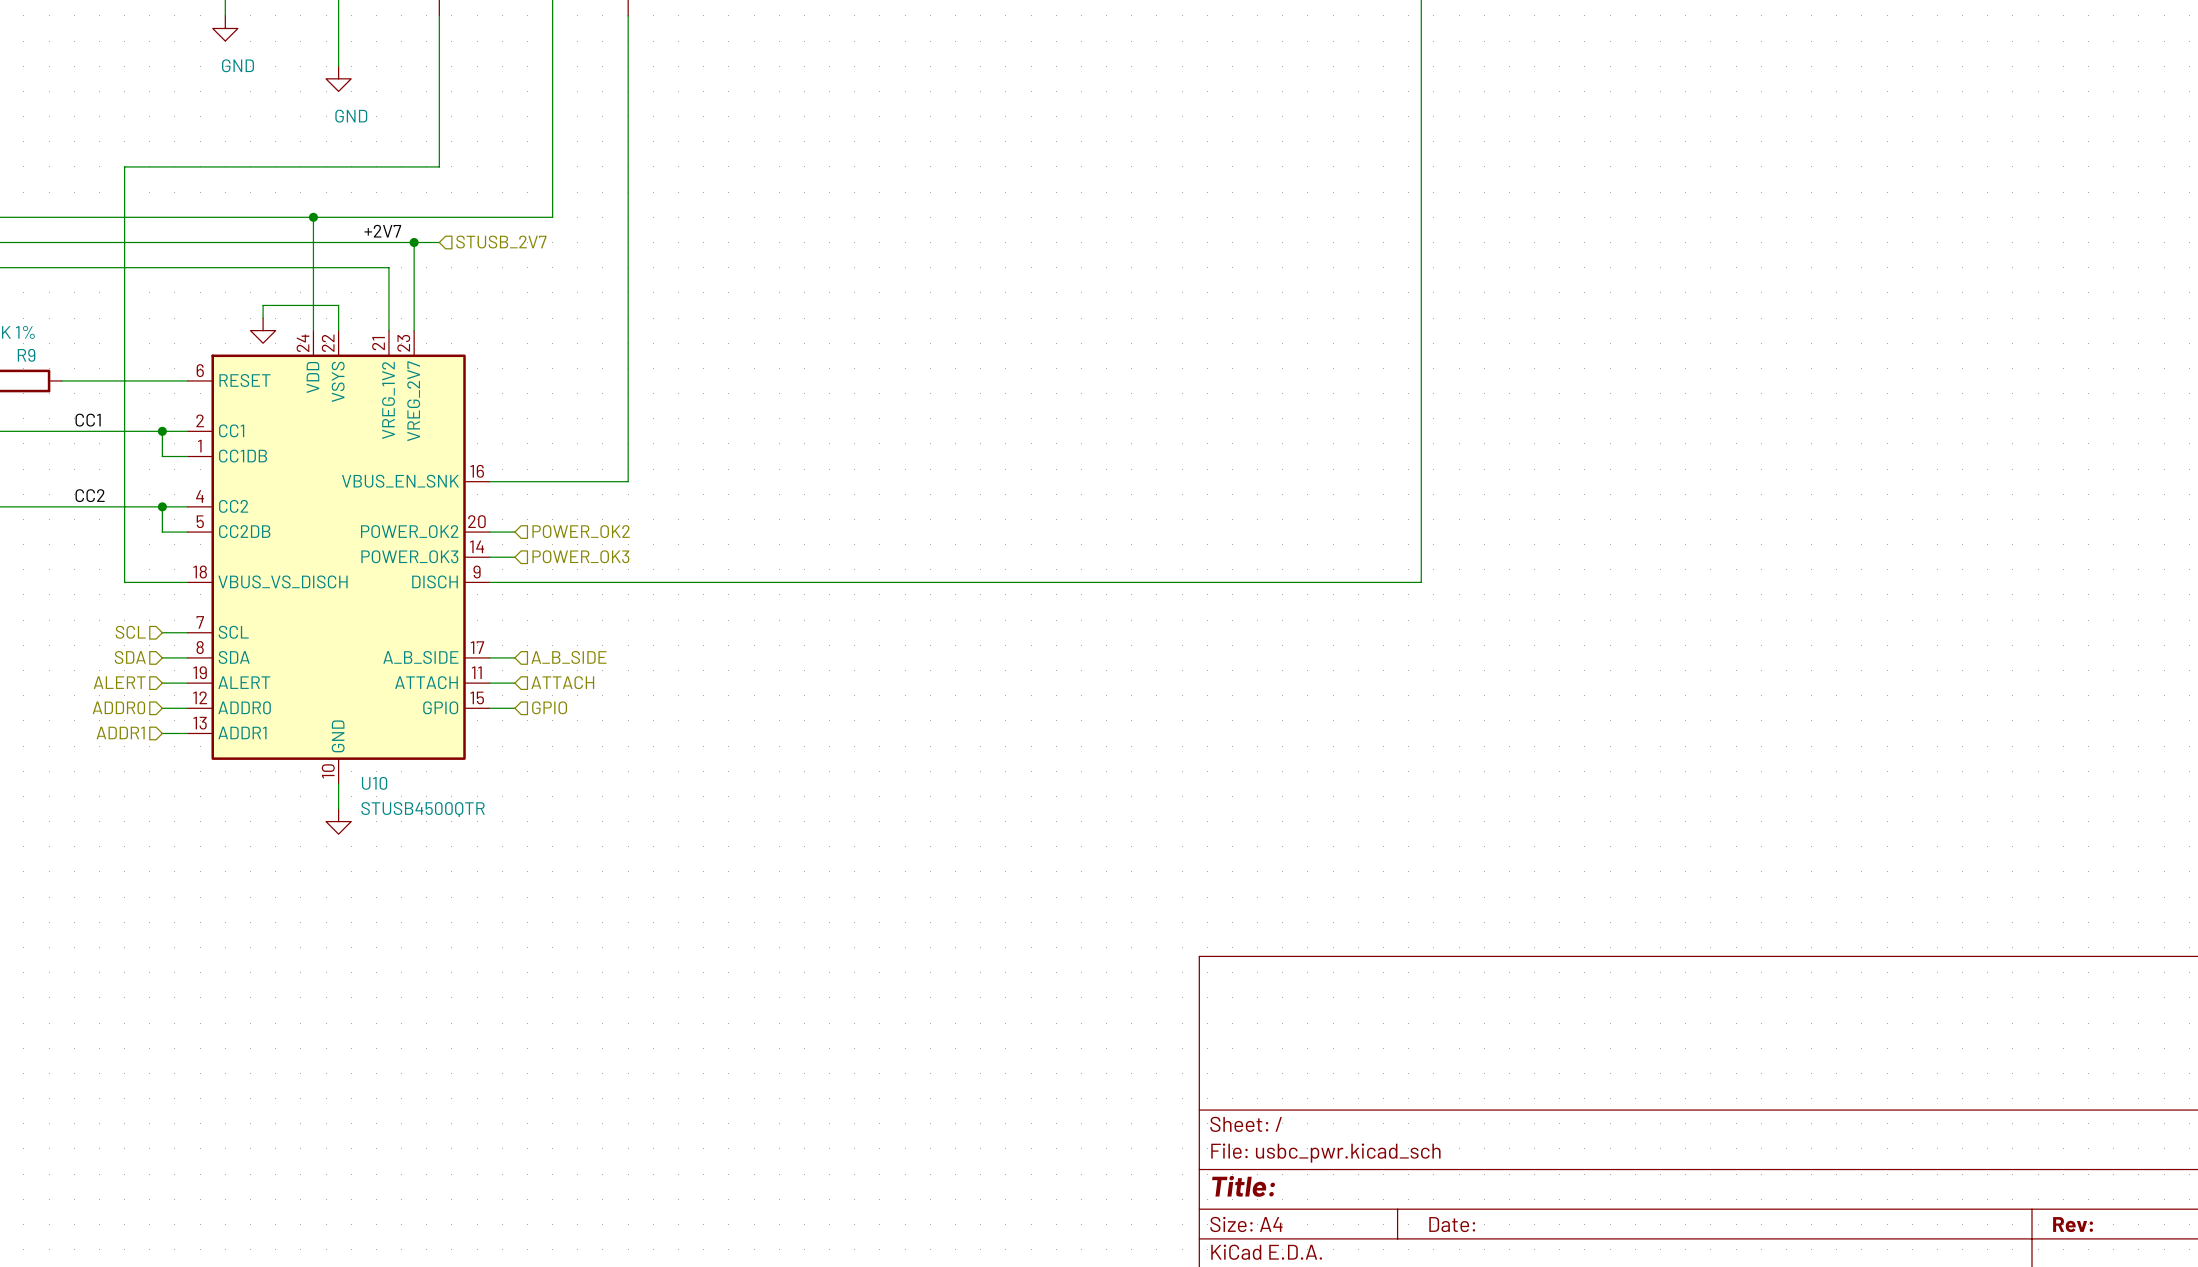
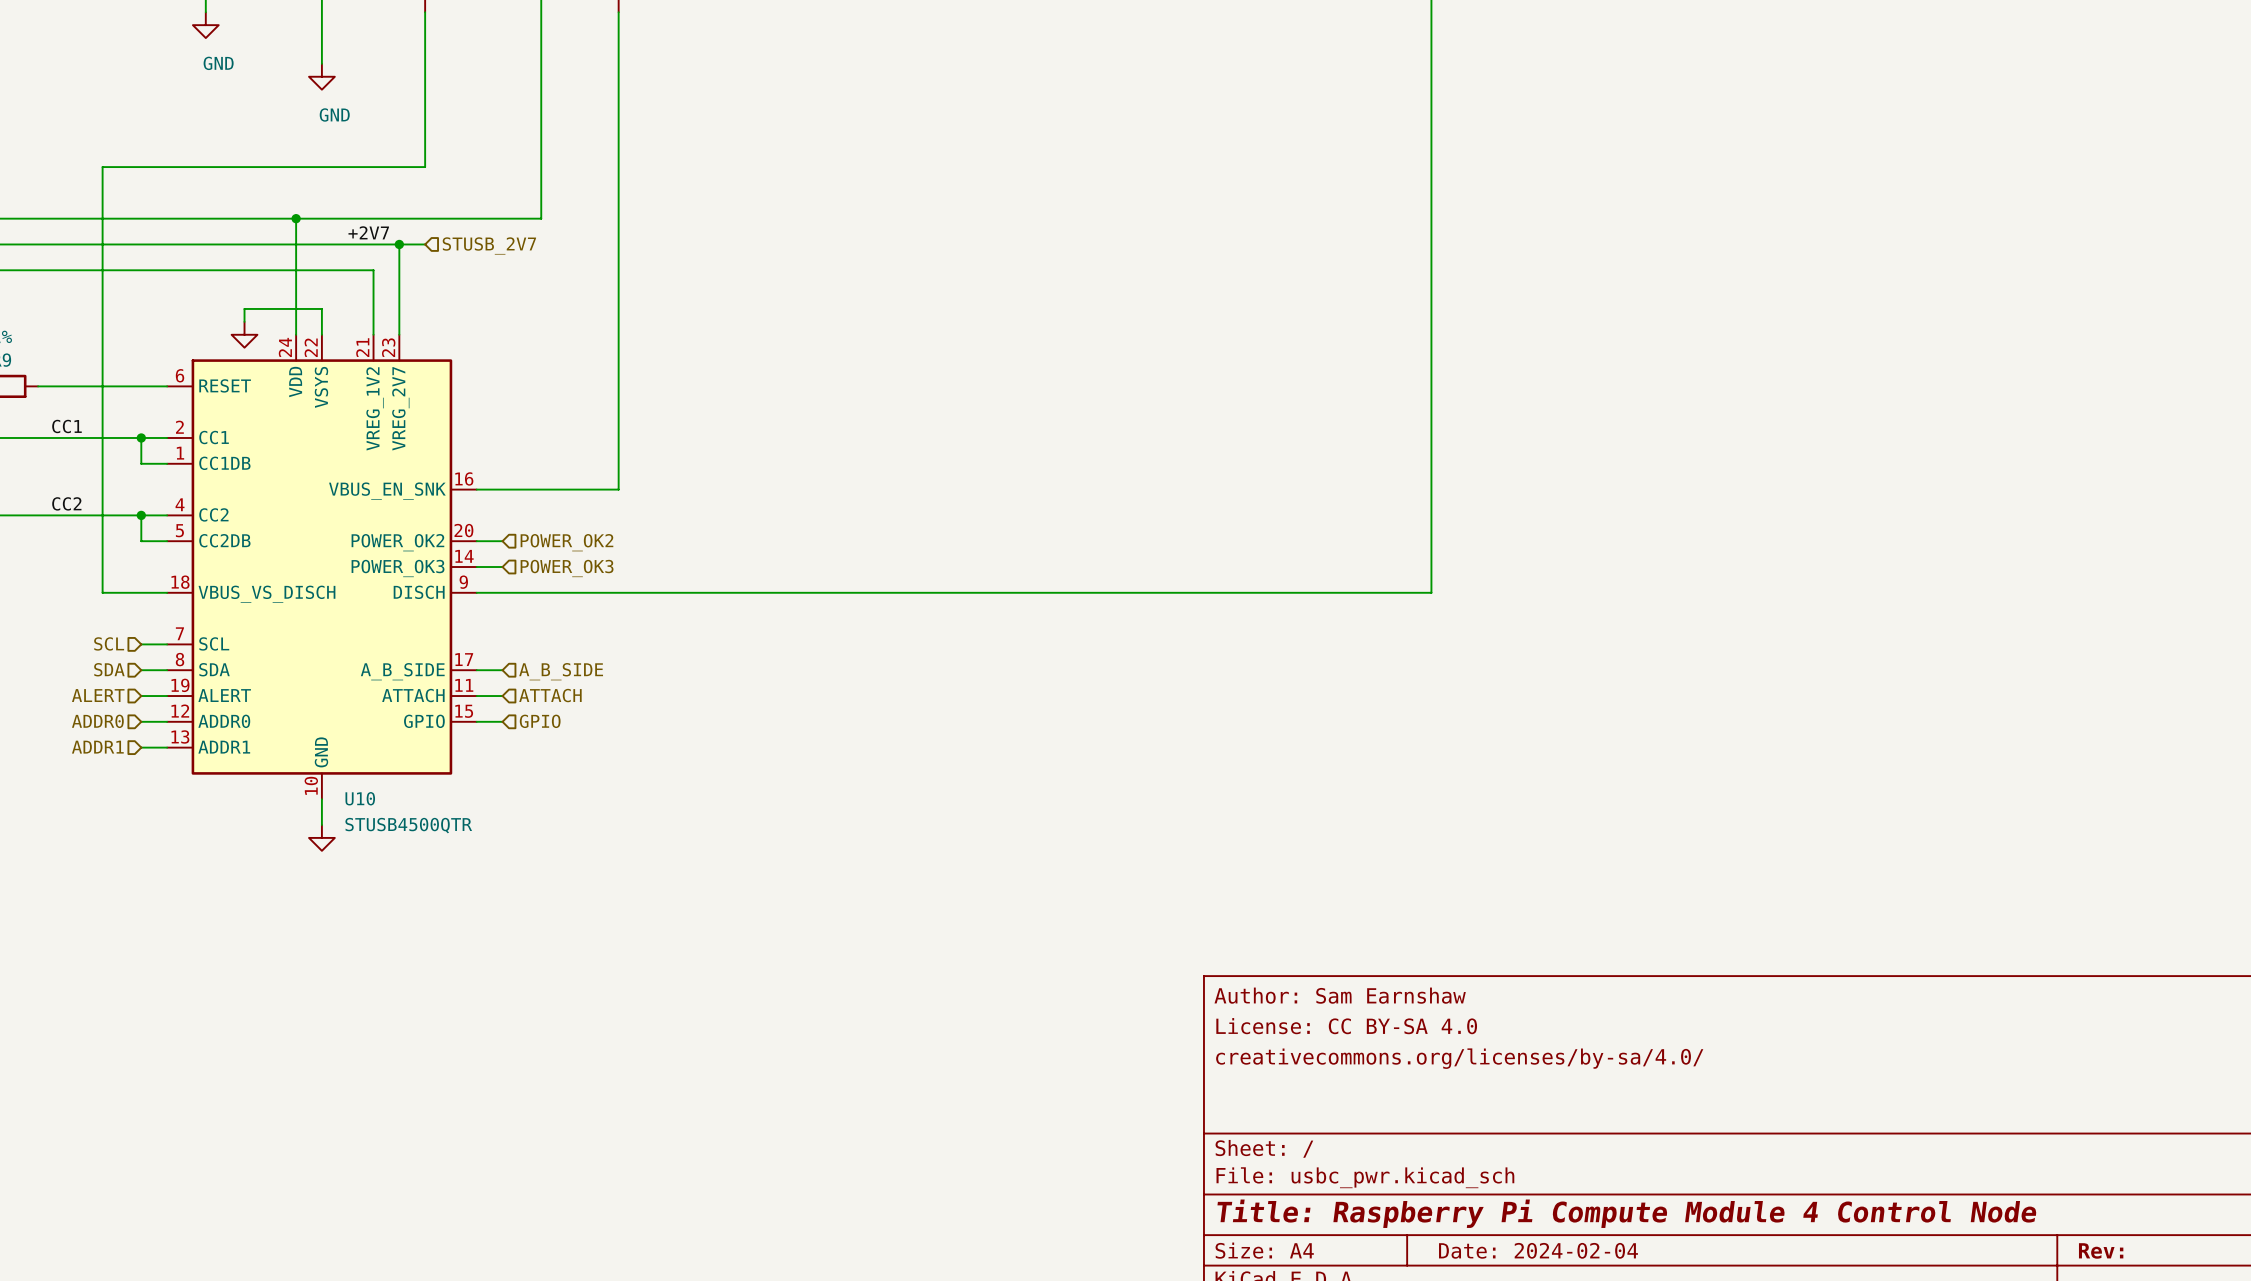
title block: none -> Author: Sam Earnshaw (1340, 995)
title block: none -> License: CC BY-SA 4.0 (1346, 1026)
title block: none -> creativecommons.org/licenses/by-sa/4.0/ (1459, 1058)
title block: Title: (1243, 1186) -> Title: Raspberry Pi Compute Module 4 Control Node (1627, 1213)
title block: Date: (1452, 1224) -> Date: 2024-02-04 (1538, 1250)

